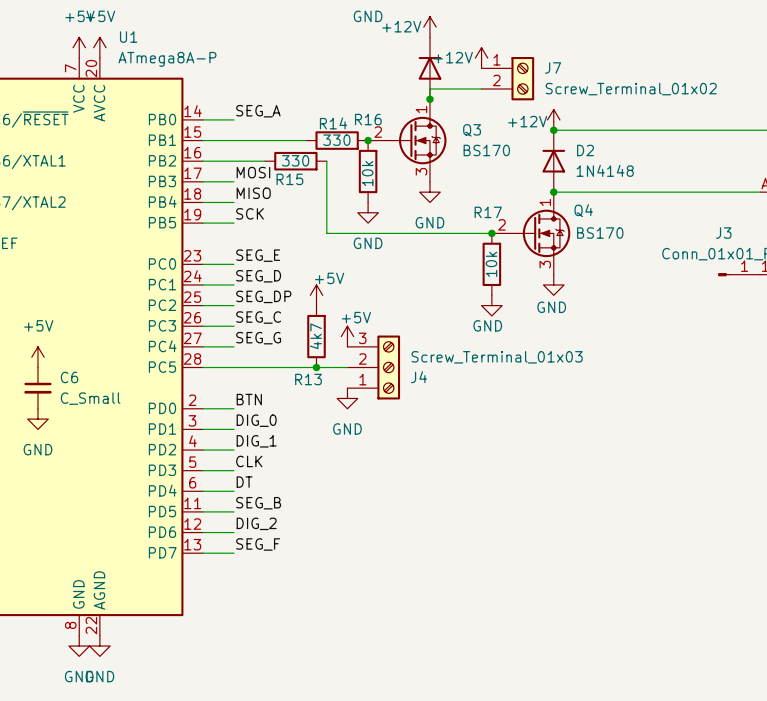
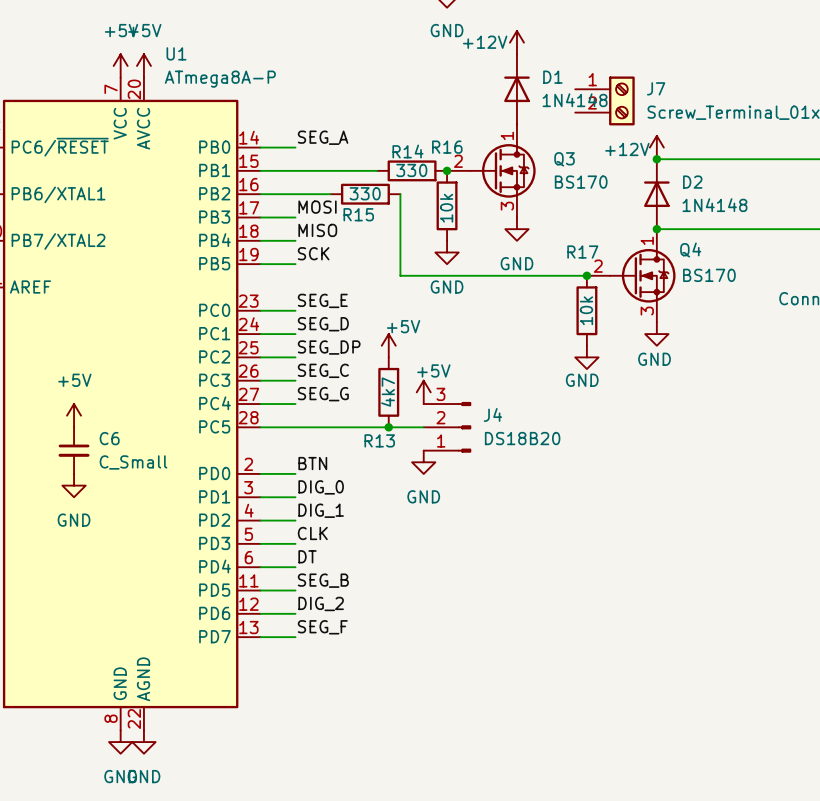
D1 name: none -> D1 (552, 77)
power symbol: +12V (481, 58) -> none
D1 value: none -> 1N4148 (575, 100)
wire: (481, 88) (429, 88) (429, 99) -> none
junction: (429, 99) -> none
J4 symbol: [347, 335, 401, 400] -> [423, 402, 472, 453]
J4 value: Screw_Terminal_01x03 (497, 357) -> DS18B20 (522, 438)
J4 name position: J4 (419, 377) -> J4 (492, 414)

